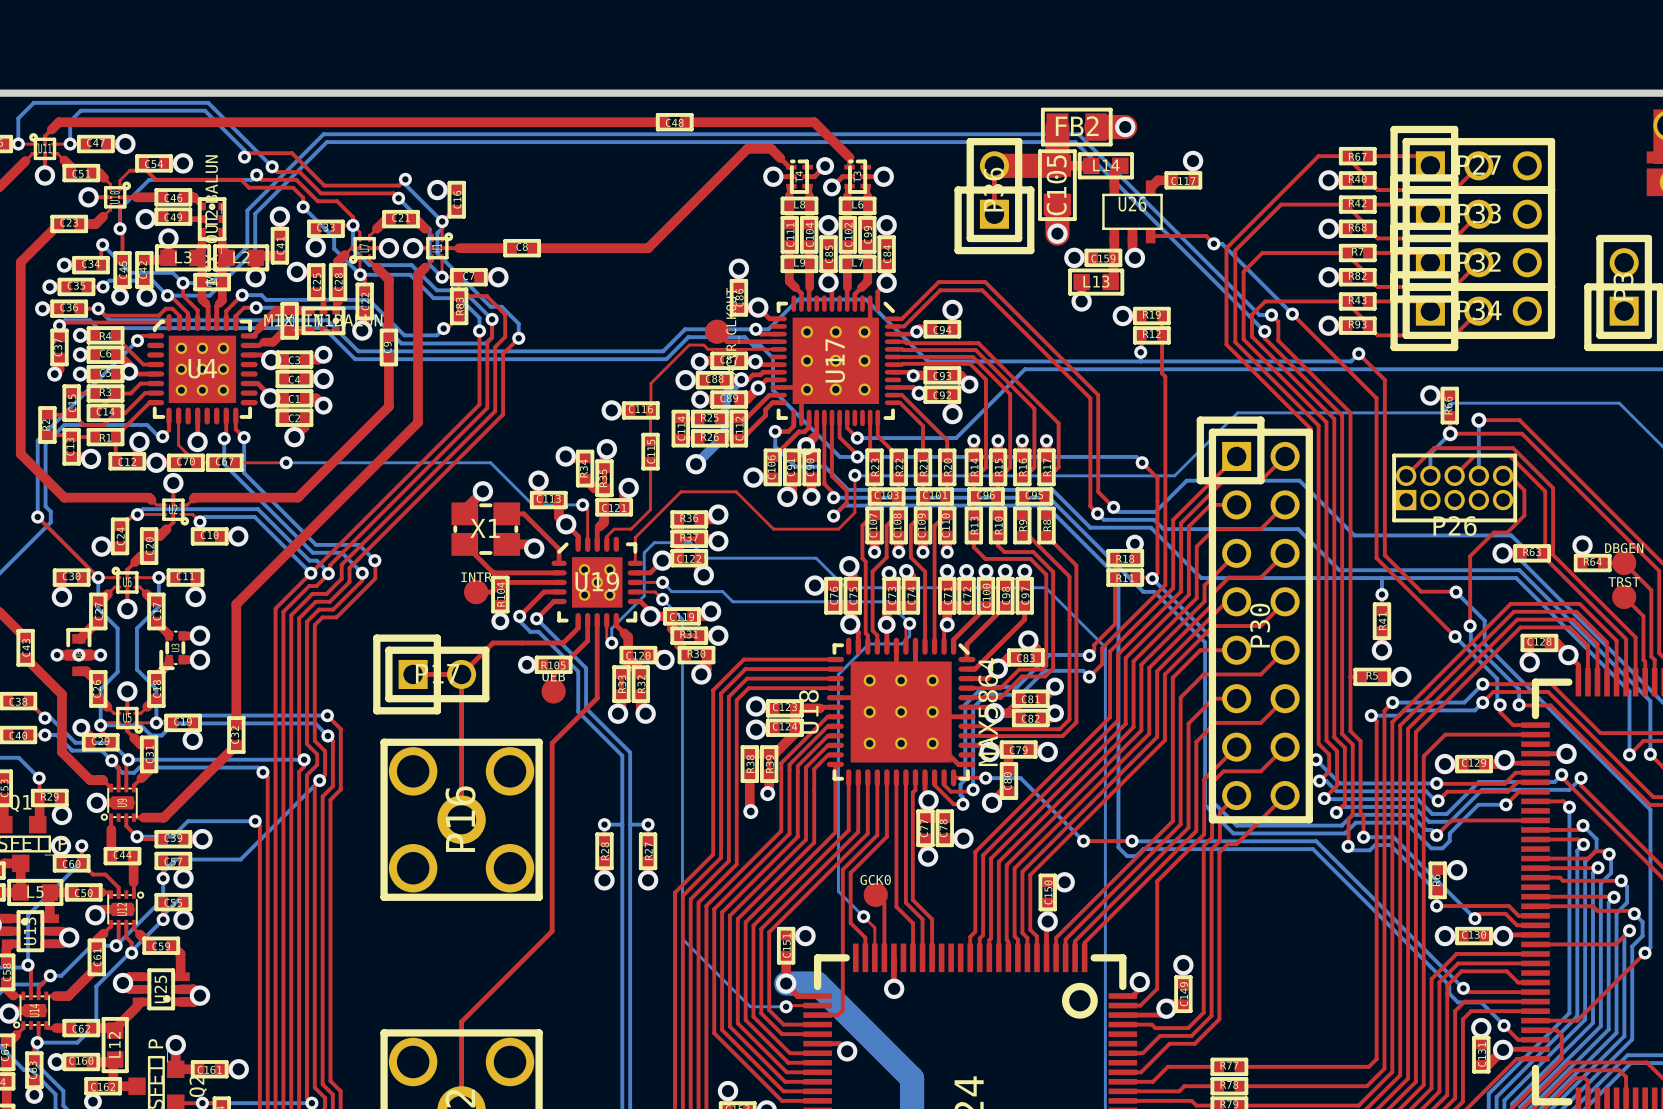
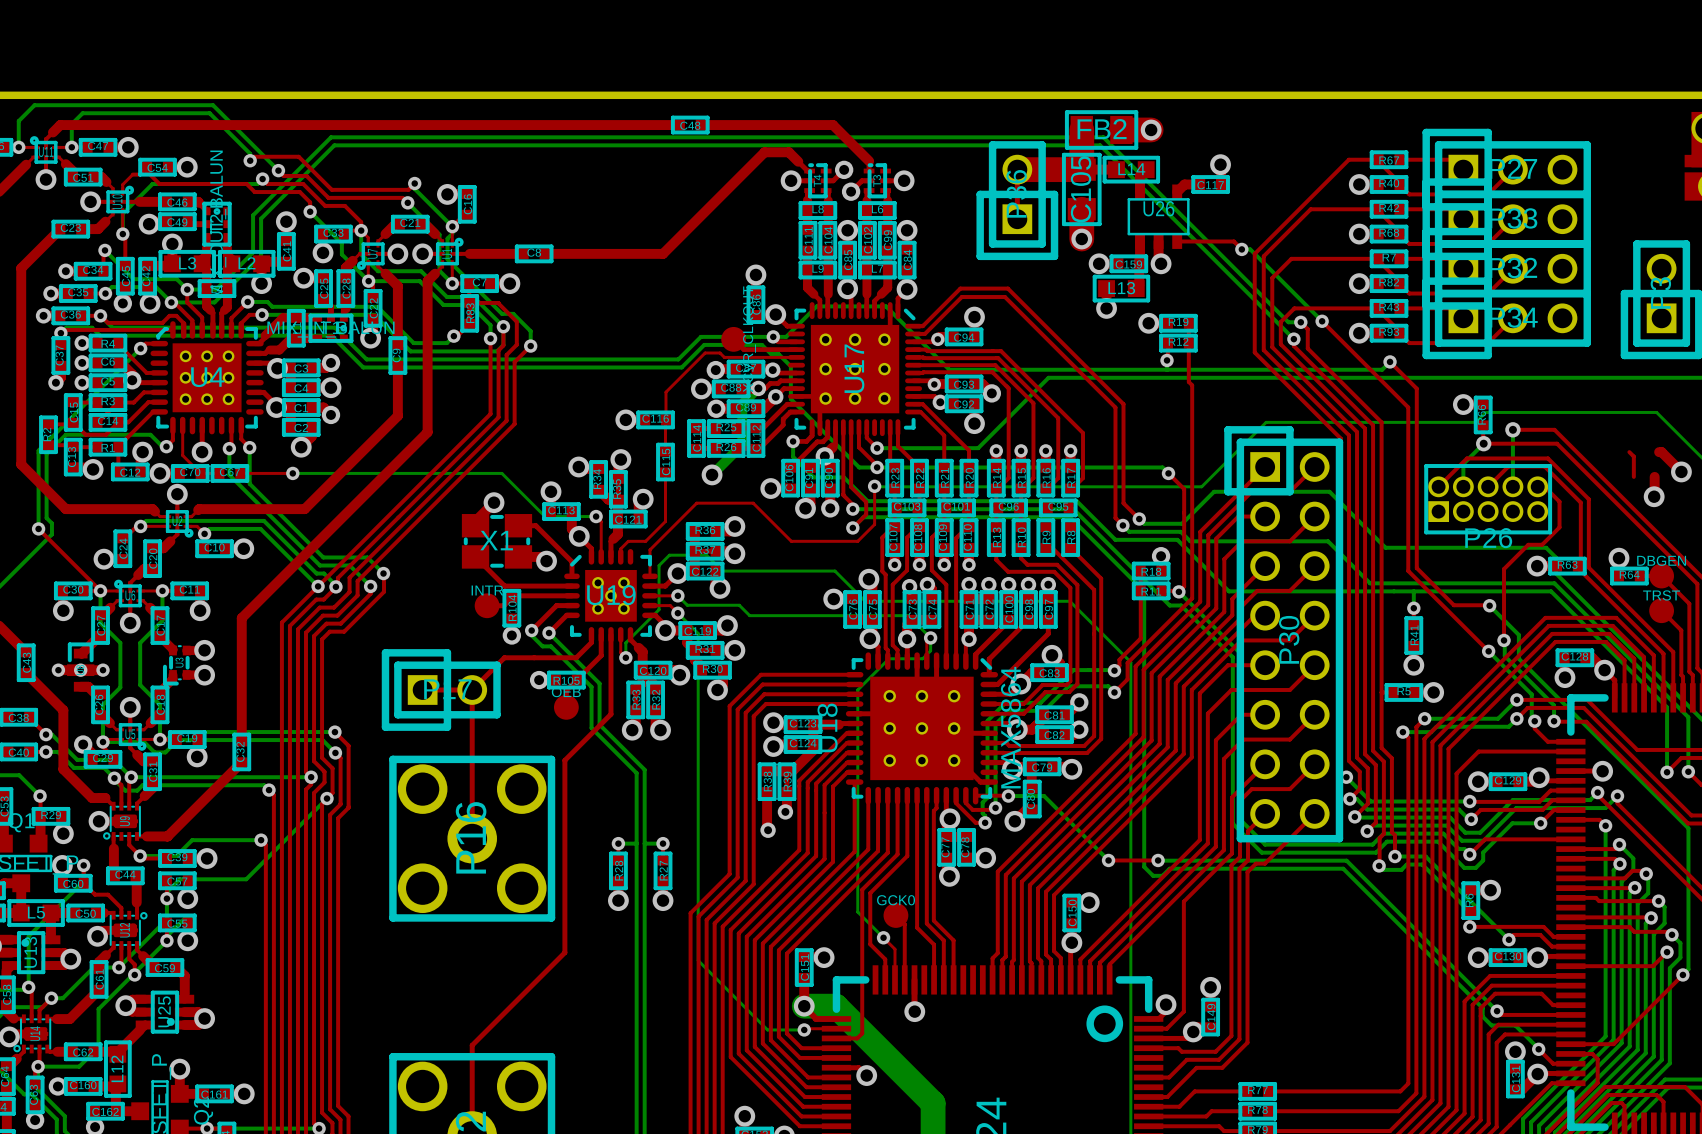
top track: none -> (1629, 452) (1633, 456) (1633, 476)
top track: none -> (1659, 452) (1661, 452) (1681, 471)
via: none -> (1681, 471)
top track: none -> (1654, 476) (1654, 496)
via: none -> (1654, 496)

